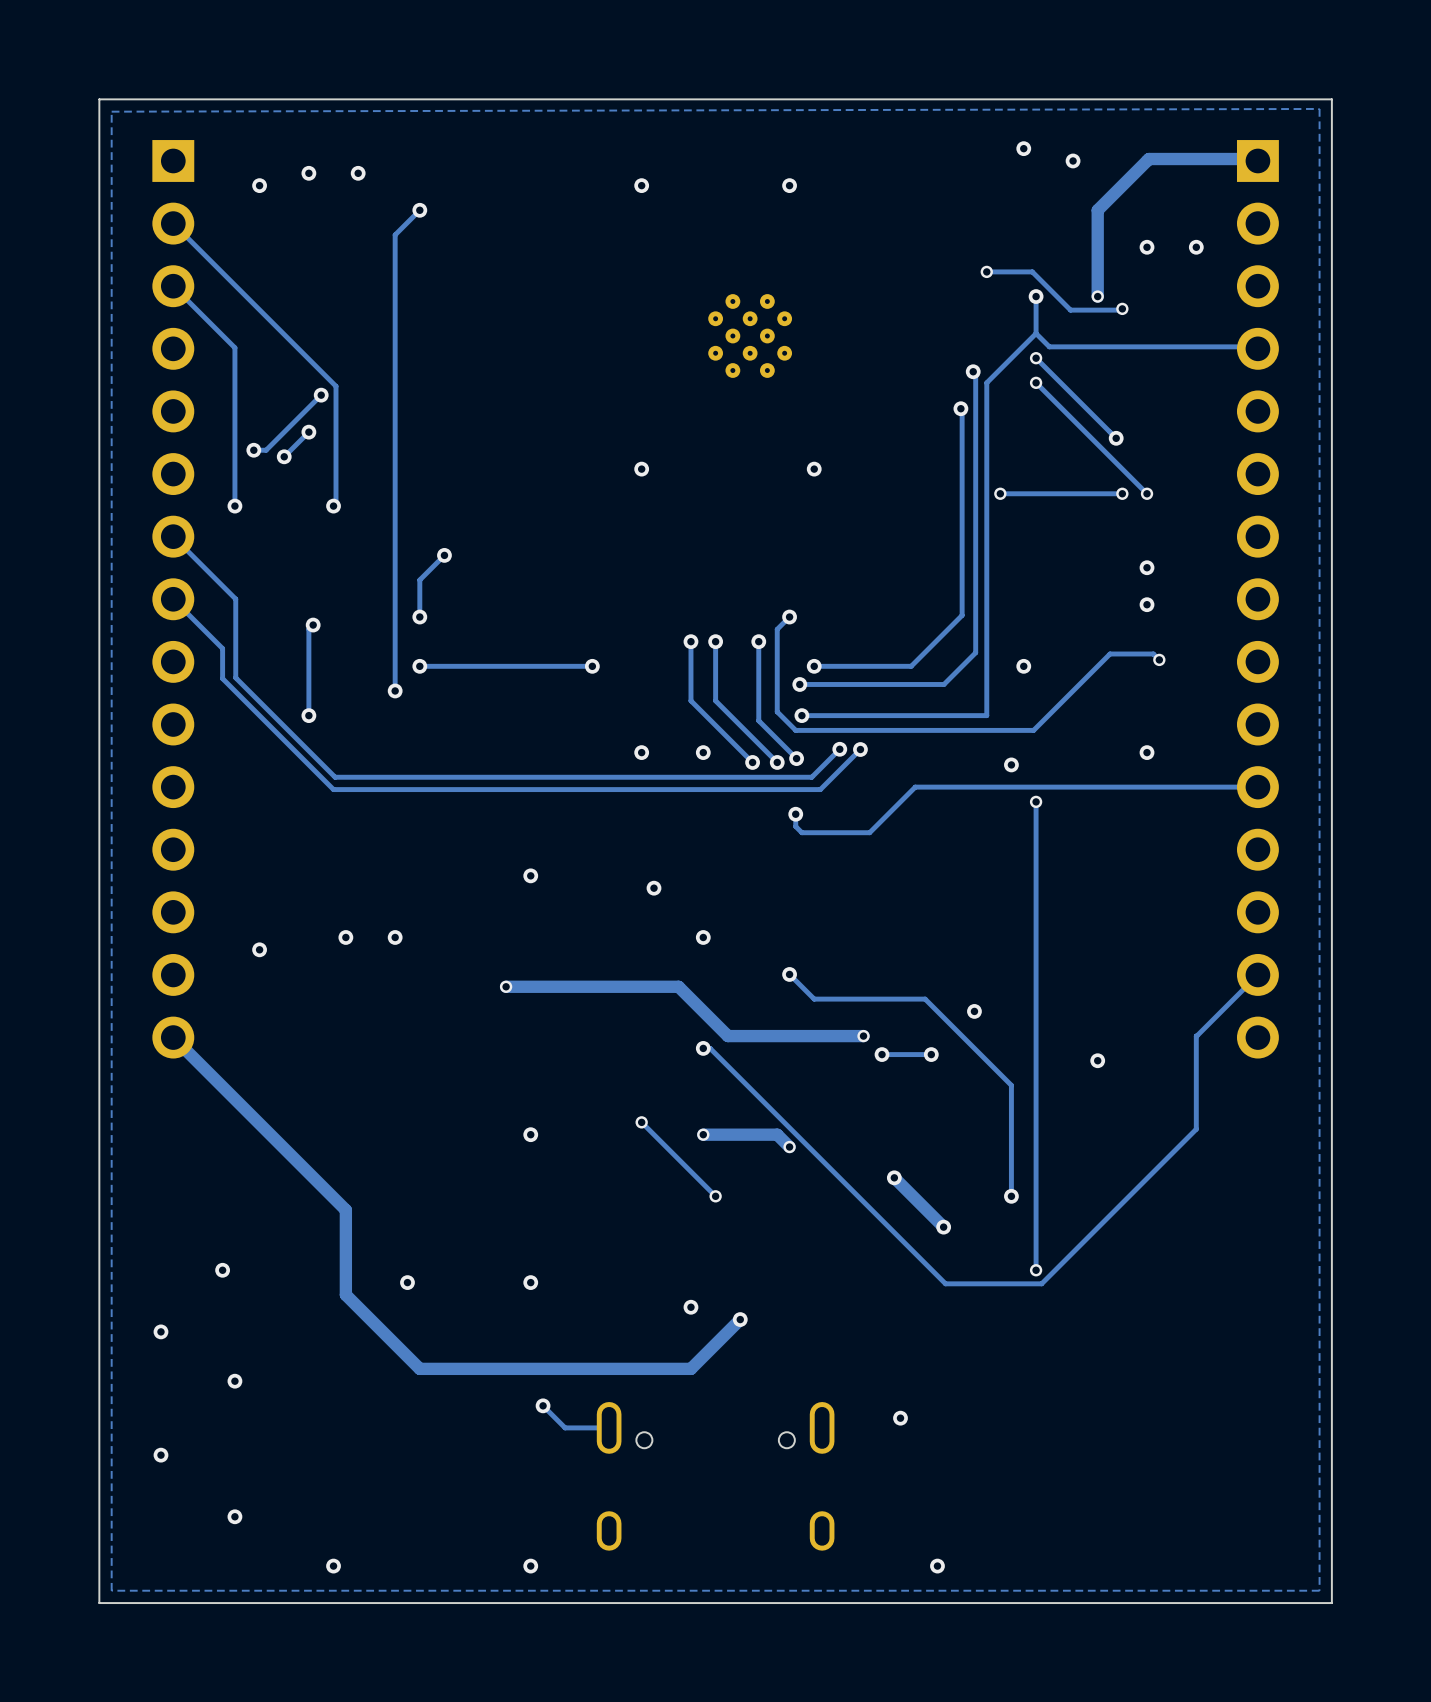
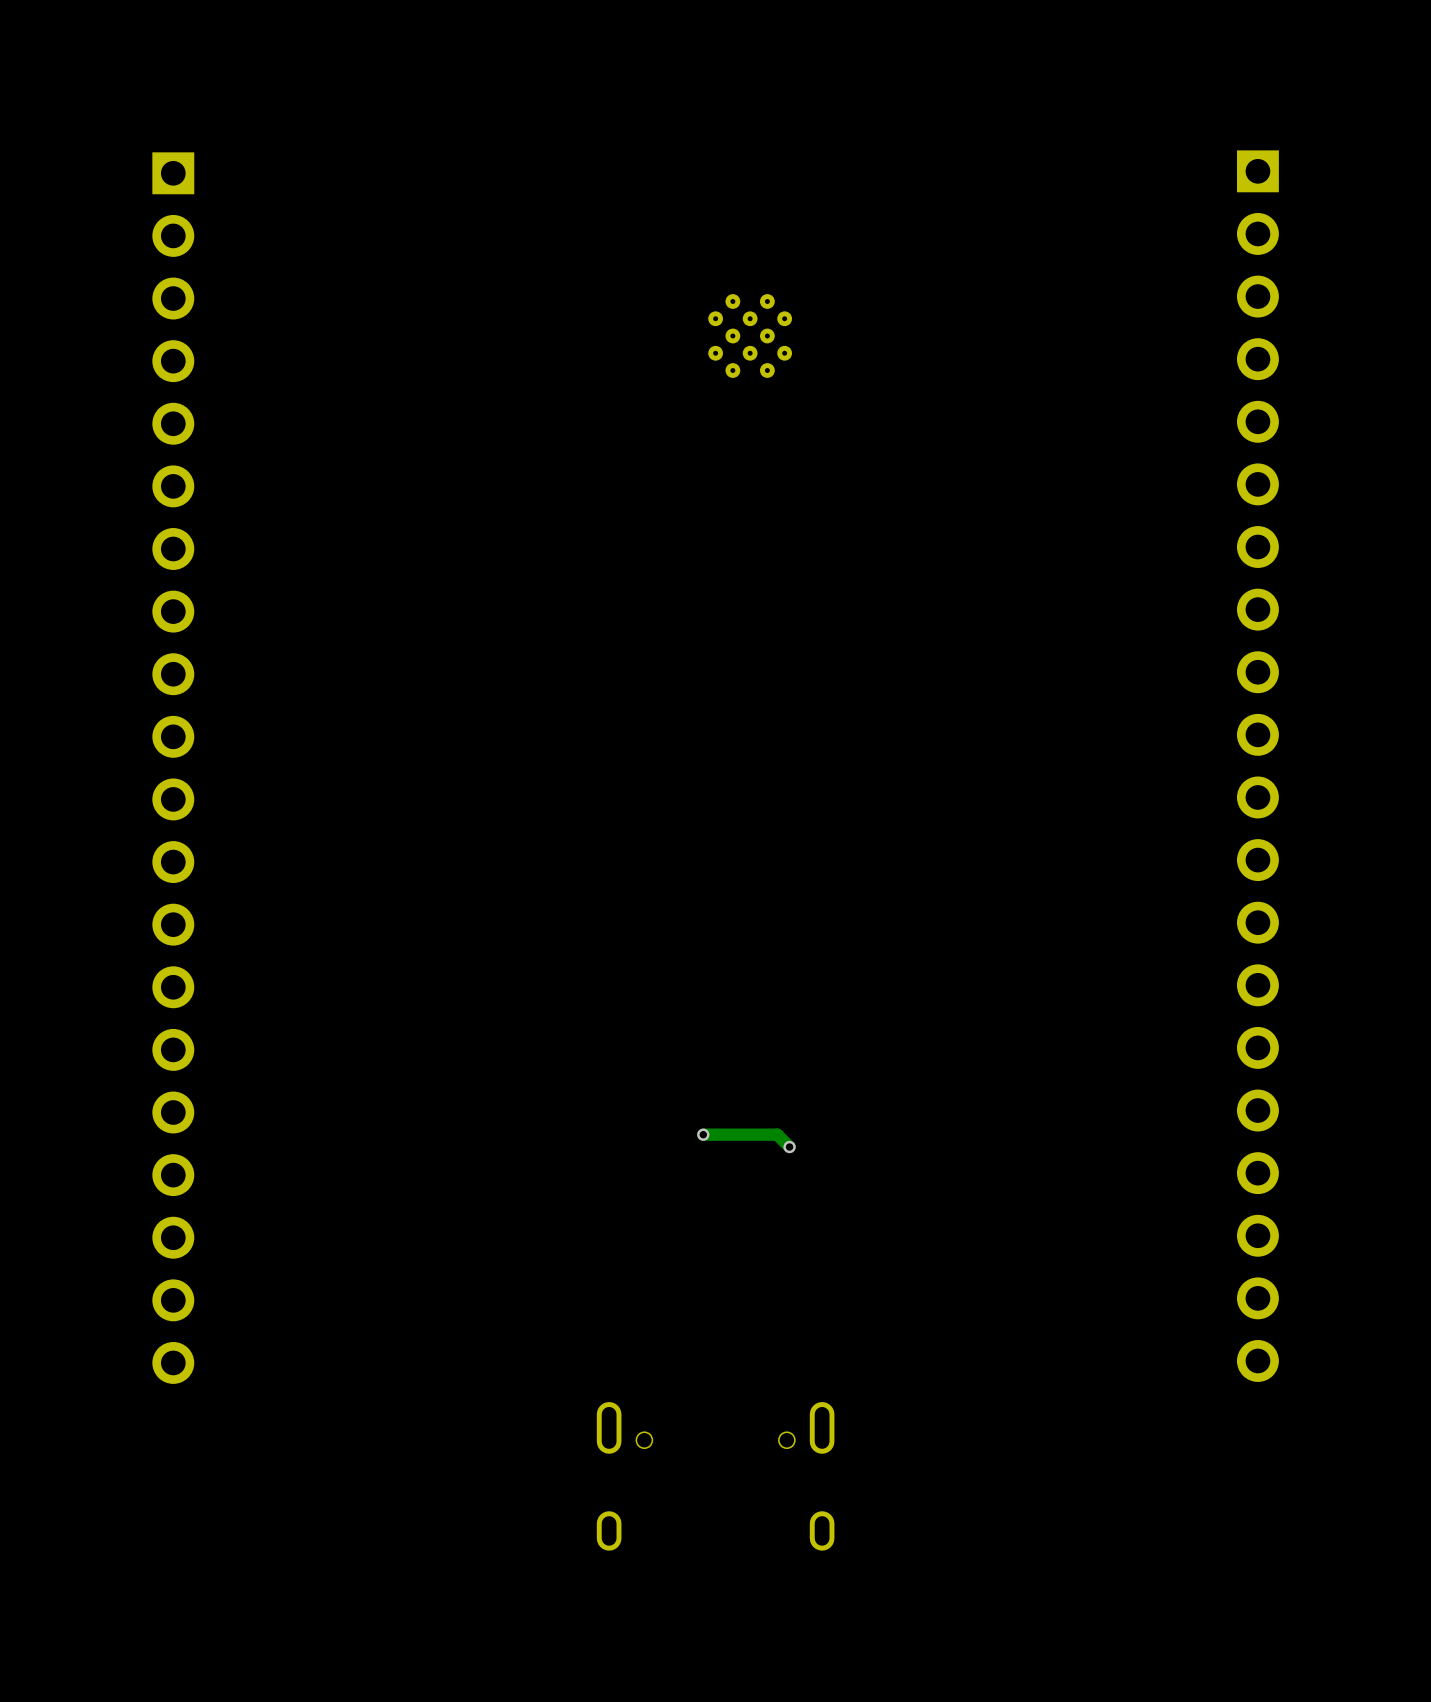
board edge: (1331, 99) (99, 99) (99, 1603) (1331, 1603) (1331, 99) -> none
zone outline: (1319, 108) (111, 111) (111, 1590) (1319, 1590) (1319, 108) -> none
via: (1023, 148) -> none
track: (1257, 159) (1148, 159) (1097, 210) (1097, 296) -> none
via: (1073, 160) -> none
via: (308, 173) -> none
via: (358, 173) -> none
via: (259, 185) -> none
via: (641, 185) -> none
via: (789, 185) -> none
track: (419, 210) (395, 234) (395, 690) -> none
via: (419, 210) -> none
track: (173, 223) (336, 386) (336, 503) (333, 506) -> none
via: (1147, 247) -> none
via: (1196, 247) -> none
track: (986, 271) (1032, 271) (1070, 310) (1122, 308) -> none
via: (986, 271) -> none
track: (173, 286) (234, 347) (234, 506) -> none
track: (1036, 296) (1036, 333) -> none
via: (1036, 296) -> none
via: (1097, 296) -> none
via: (1122, 308) -> none
track: (1036, 333) (1049, 346) (1257, 346) -> none
track: (1036, 333) (986, 382) (986, 715) (801, 715) -> none
track: (1036, 358) (1116, 438) -> none
via: (1036, 358) -> none
track: (973, 371) (975, 374) (975, 652) (943, 684) (799, 684) -> none
via: (973, 371) -> none
track: (1036, 382) (1147, 493) -> none
via: (1036, 382) -> none
track: (321, 395) (266, 450) (253, 450) -> none
via: (321, 395) -> none
track: (960, 408) (962, 615) (911, 666) (814, 666) -> none
via: (960, 408) -> none
track: (308, 432) (284, 456) -> none
via: (308, 432) -> none
via: (1116, 438) -> none
via: (253, 450) -> none
via: (284, 456) -> none
via: (641, 469) -> none
via: (814, 469) -> none
via: (1000, 493) -> none
track: (1122, 493) (1000, 493) -> none
via: (1122, 493) -> none
via: (1147, 493) -> none
via: (234, 506) -> none
via: (333, 506) -> none
track: (173, 536) (235, 599) (235, 677) (335, 777) (811, 777) (839, 749) -> none
track: (444, 555) (419, 580) (419, 617) -> none
via: (444, 555) -> none
via: (1147, 567) -> none
track: (173, 599) (222, 648) (222, 678) (333, 789) (820, 789) (860, 749) -> none
part: (173, 599) -> none
part: (1257, 599) -> none
via: (1147, 604) -> none
via: (419, 617) -> none
track: (789, 617) (777, 629) (777, 711) (795, 730) (1033, 730) (1110, 653) (1153, 653) (1159, 659) -> none
via: (789, 617) -> none
track: (313, 625) (308, 629) (308, 715) -> none
via: (313, 625) -> none
track: (690, 641) (690, 700) (752, 762) -> none
via: (690, 641) -> none
track: (715, 641) (715, 700) (777, 762) -> none
via: (715, 641) -> none
track: (758, 641) (758, 720) (796, 758) -> none
via: (758, 641) -> none
via: (1159, 659) -> none
via: (419, 666) -> none
track: (592, 666) (419, 666) -> none
via: (592, 666) -> none
via: (814, 666) -> none
via: (1023, 666) -> none
via: (799, 684) -> none
via: (395, 690) -> none
via: (308, 715) -> none
via: (801, 715) -> none
via: (839, 749) -> none
via: (860, 749) -> none
via: (641, 752) -> none
via: (703, 752) -> none
via: (1147, 752) -> none
via: (796, 758) -> none
via: (752, 762) -> none
via: (777, 762) -> none
via: (1011, 764) -> none
part: none -> (1257, 766)
part: none -> (173, 768)
track: (1257, 787) (915, 787) (869, 832) (801, 832) (795, 826) (795, 814) -> none
track: (1036, 801) (1036, 1270) -> none
via: (1036, 801) -> none
via: (795, 814) -> none
via: (530, 875) -> none
via: (653, 888) -> none
via: (345, 937) -> none
via: (395, 937) -> none
via: (703, 937) -> none
via: (259, 949) -> none
track: (789, 974) (814, 999) (925, 999) (1011, 1085) (1011, 1196) -> none
via: (789, 974) -> none
track: (1257, 974) (1196, 1036) -> none
track: (506, 986) (678, 986) (727, 1036) (863, 1036) -> none
via: (506, 986) -> none
via: (974, 1011) -> none
via: (863, 1036) -> none
track: (1196, 1036) (1196, 1129) (1041, 1283) (945, 1283) (710, 1048) (703, 1048) -> none
track: (173, 1037) (345, 1210) (345, 1294) (419, 1368) (690, 1368) (740, 1319) -> none
via: (703, 1048) -> none
via: (882, 1054) -> none
track: (931, 1054) (882, 1054) -> none
via: (931, 1054) -> none
via: (1097, 1060) -> none
track: (641, 1122) (715, 1196) -> none
via: (641, 1122) -> none
via: (530, 1134) -> none
track: (894, 1177) (943, 1227) -> none
via: (894, 1177) -> none
via: (715, 1196) -> none
via: (1011, 1196) -> none
via: (943, 1227) -> none
via: (222, 1270) -> none
via: (1036, 1270) -> none
via: (407, 1282) -> none
via: (530, 1282) -> none
via: (690, 1307) -> none
via: (740, 1319) -> none
via: (160, 1331) -> none
via: (234, 1381) -> none
track: (543, 1405) (565, 1427) (609, 1427) -> none
via: (543, 1405) -> none
via: (900, 1418) -> none
via: (160, 1455) -> none
via: (234, 1516) -> none
via: (333, 1566) -> none
via: (530, 1566) -> none
via: (937, 1566) -> none

